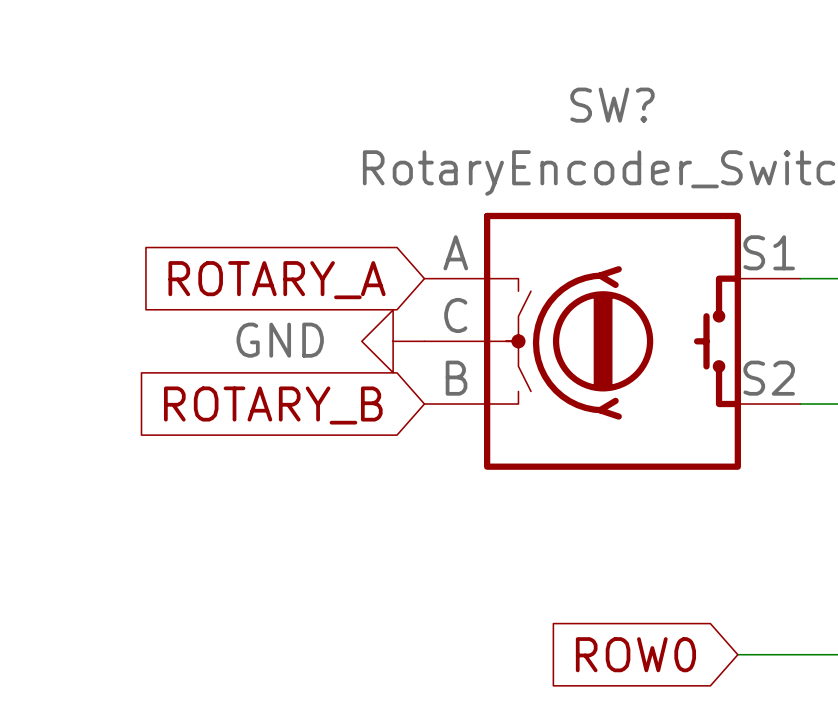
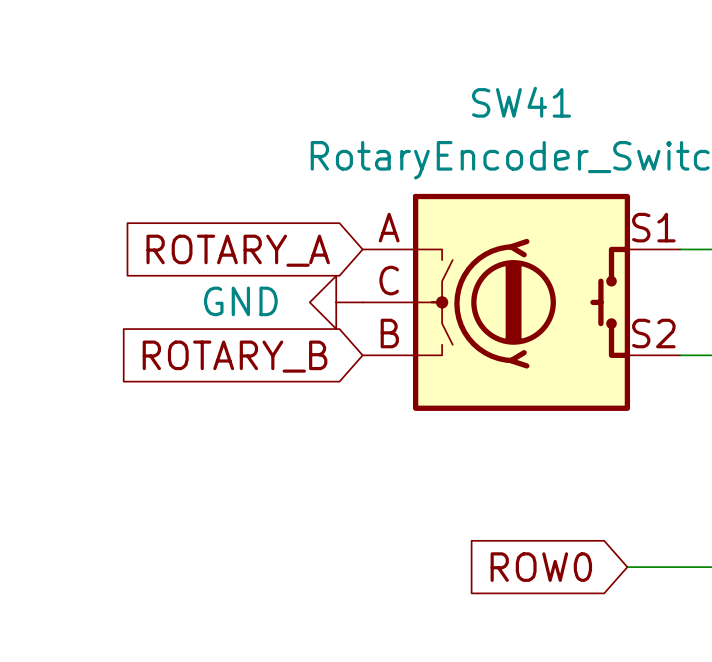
SW? name: SW? (612, 105) -> SW41 (521, 102)

